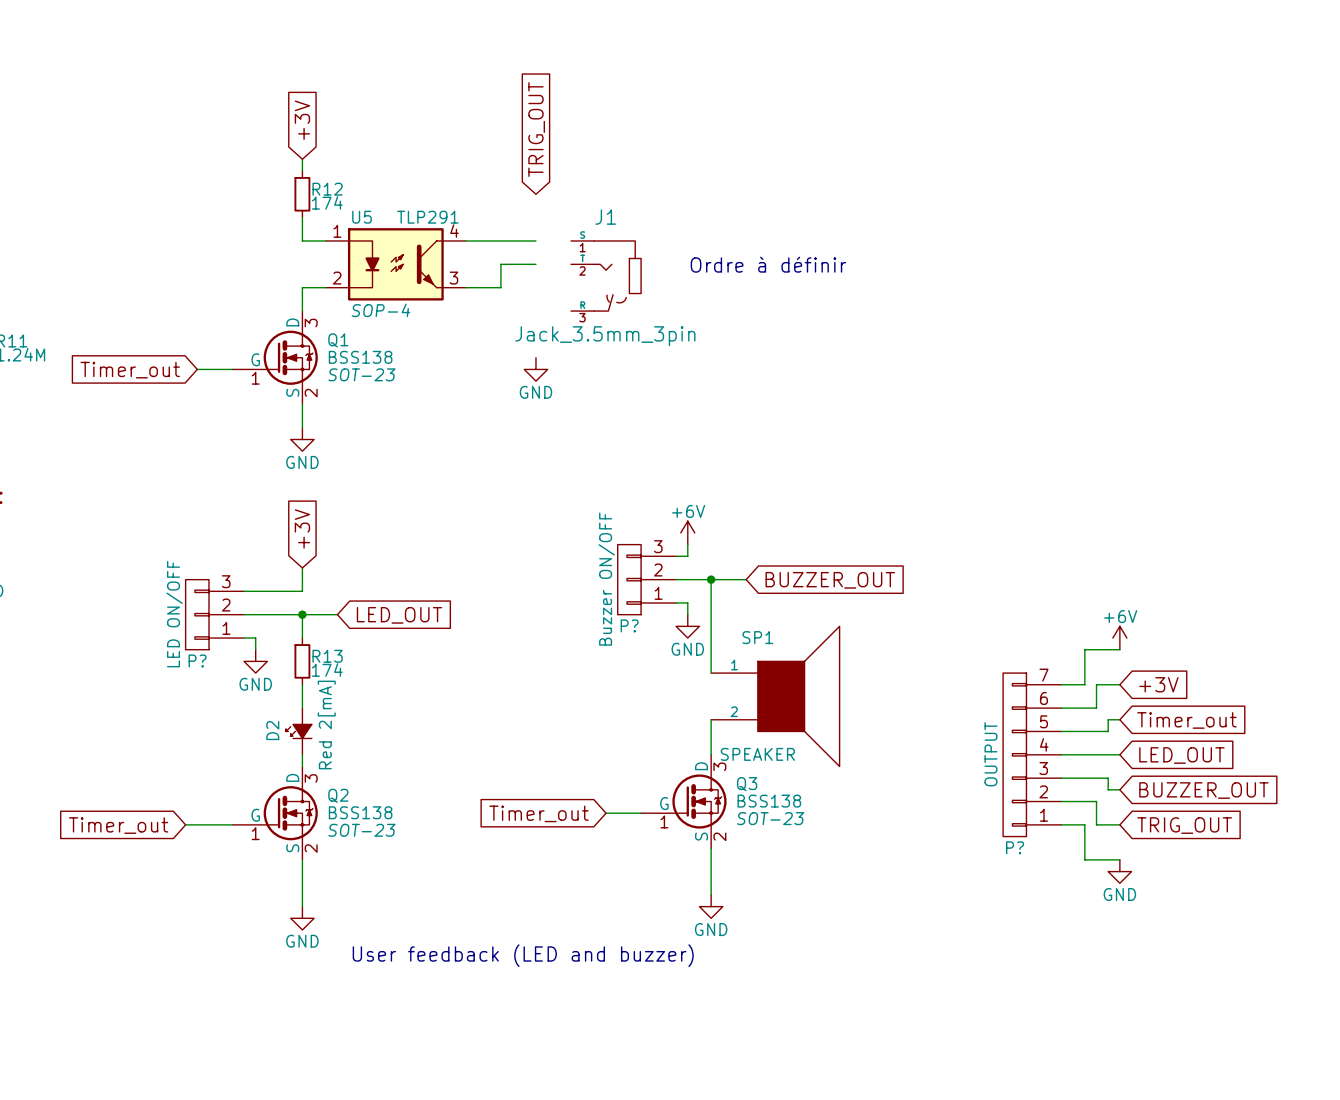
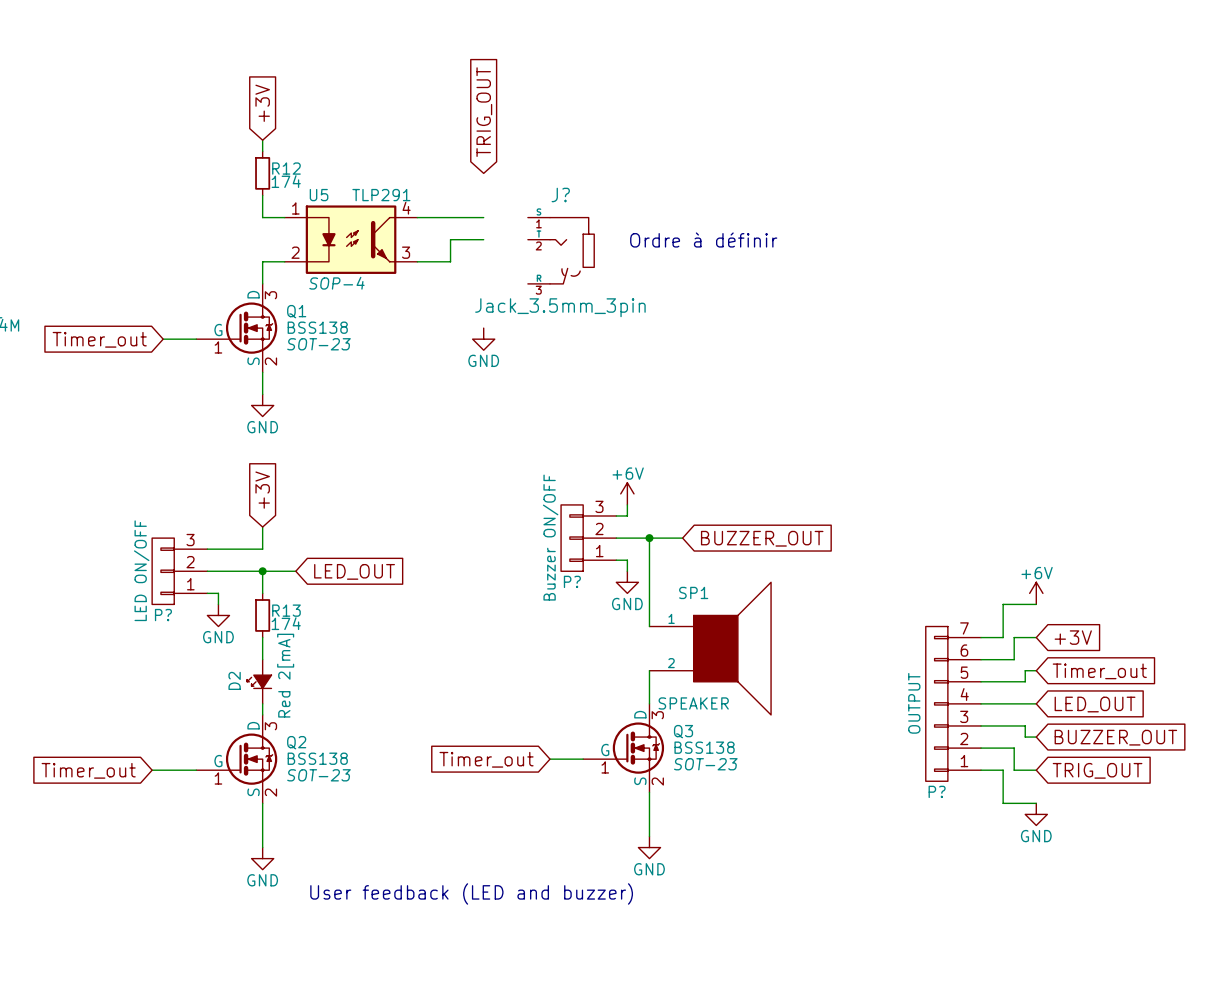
J1: Jack_3.5mm_3pin (606, 276) -> none
J?: none -> Jack_3.5mm_3pin (561, 250)

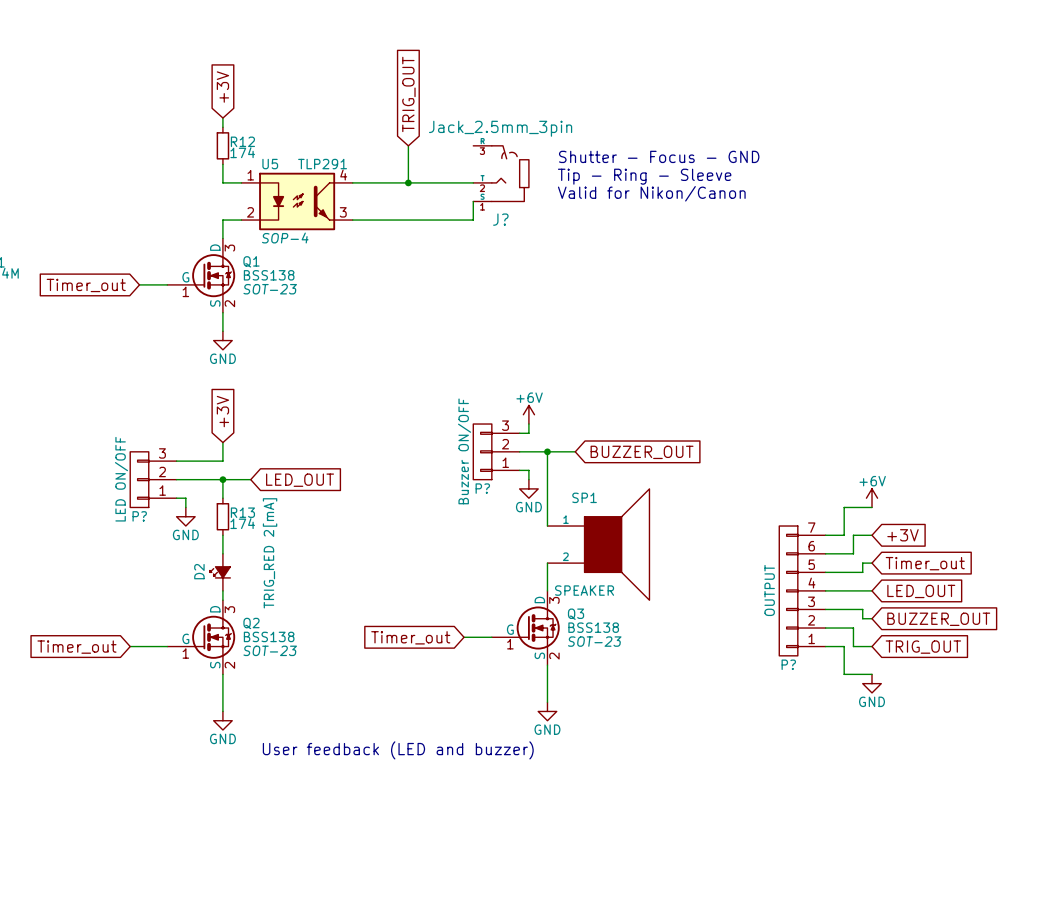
wire: none -> (408, 145) (408, 182) (473, 182)
text: none -> Shutter - Focus - GND (659, 156)
J?: none -> Jack_2.5mm_3pin (501, 173)
text: none -> Tip - Ring - Sleeve (644, 176)
junction: none -> (408, 182)
text: none -> Valid for Nikon/Canon (651, 193)
wire: (483, 239) (450, 239) (450, 261) -> (473, 201) (473, 220) (380, 220)
text: Ordre à définir (703, 240) -> none
J?: Jack_3.5mm_3pin (561, 250) -> none
power symbol: GND (483, 339) -> none
D2 value: Red 2[mA] (285, 675) -> TRIG_RED 2[mA] (270, 553)

